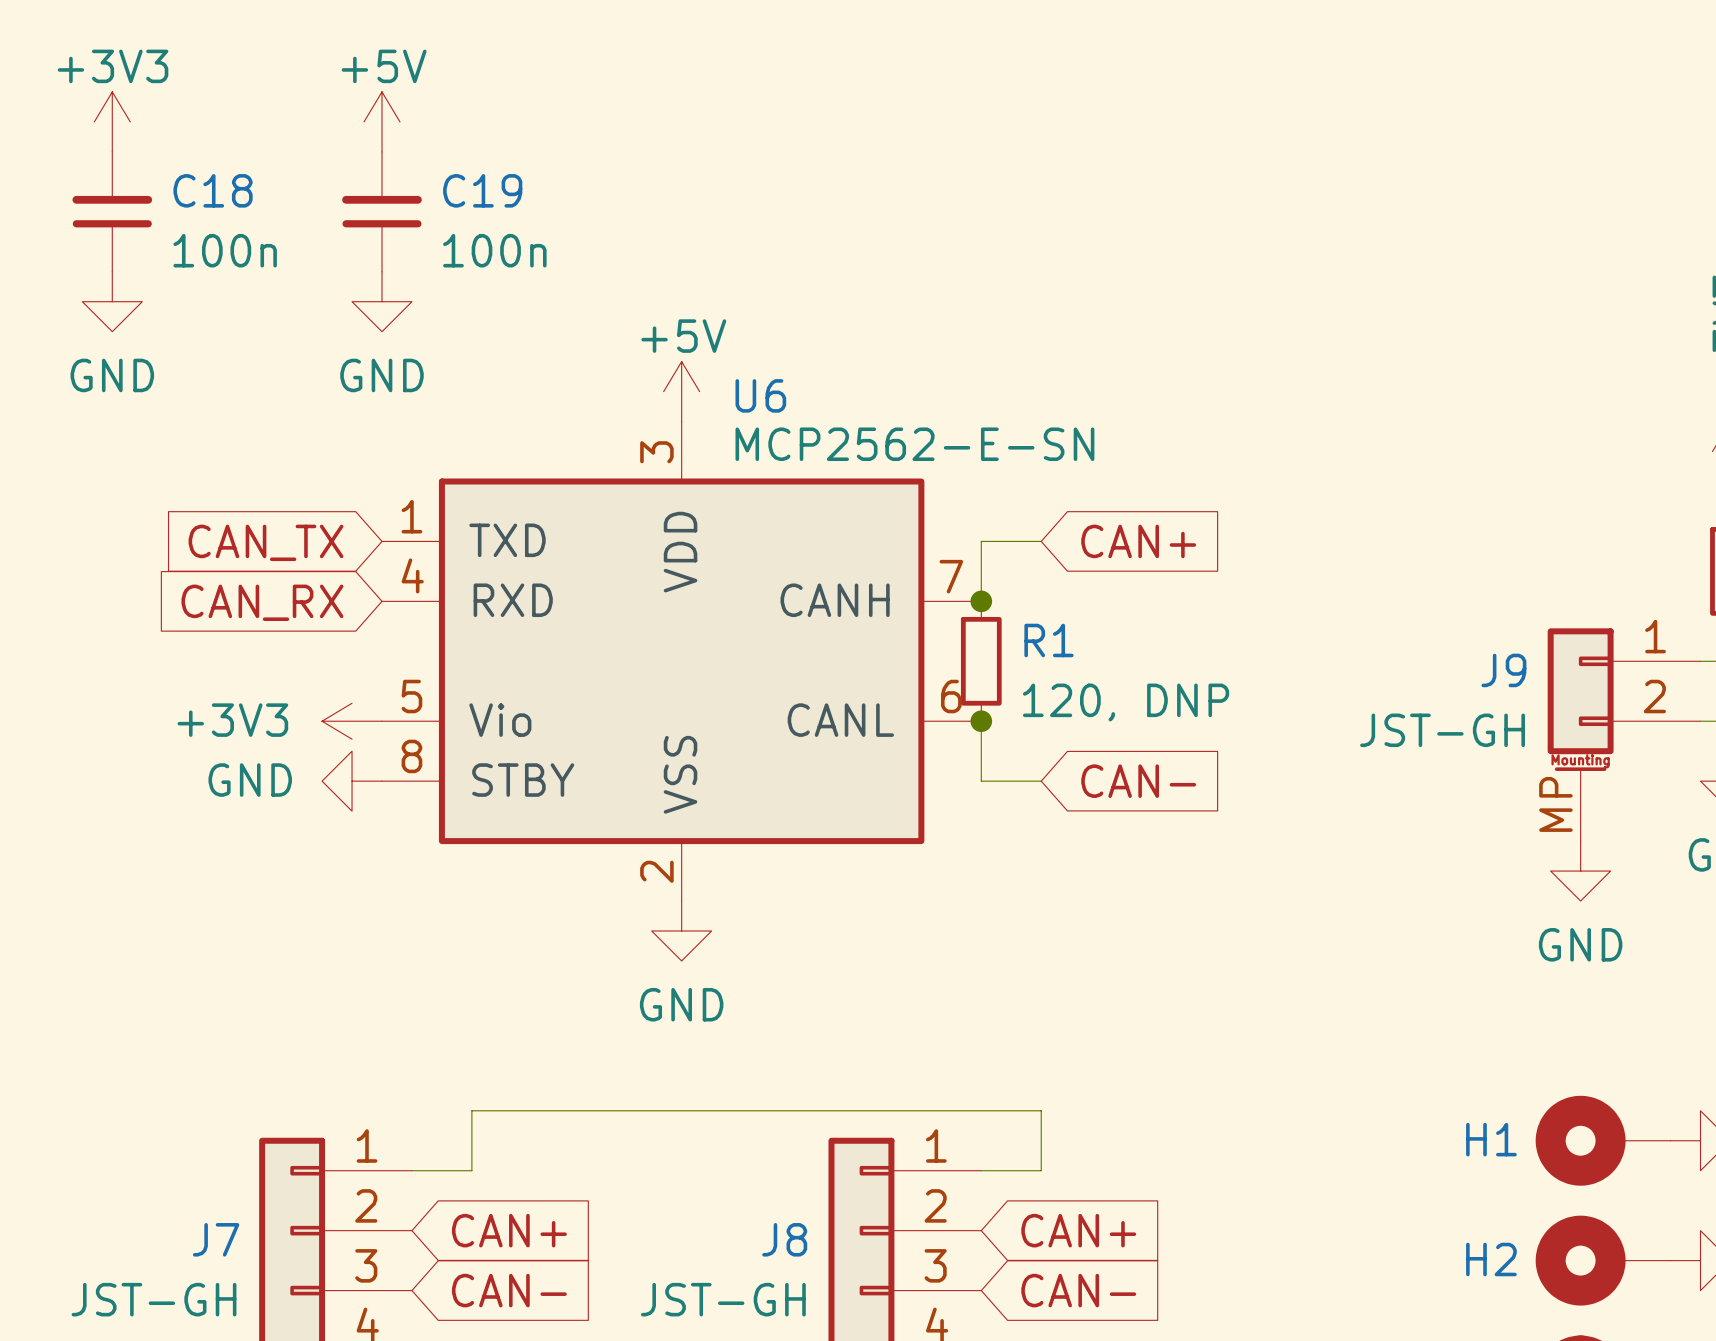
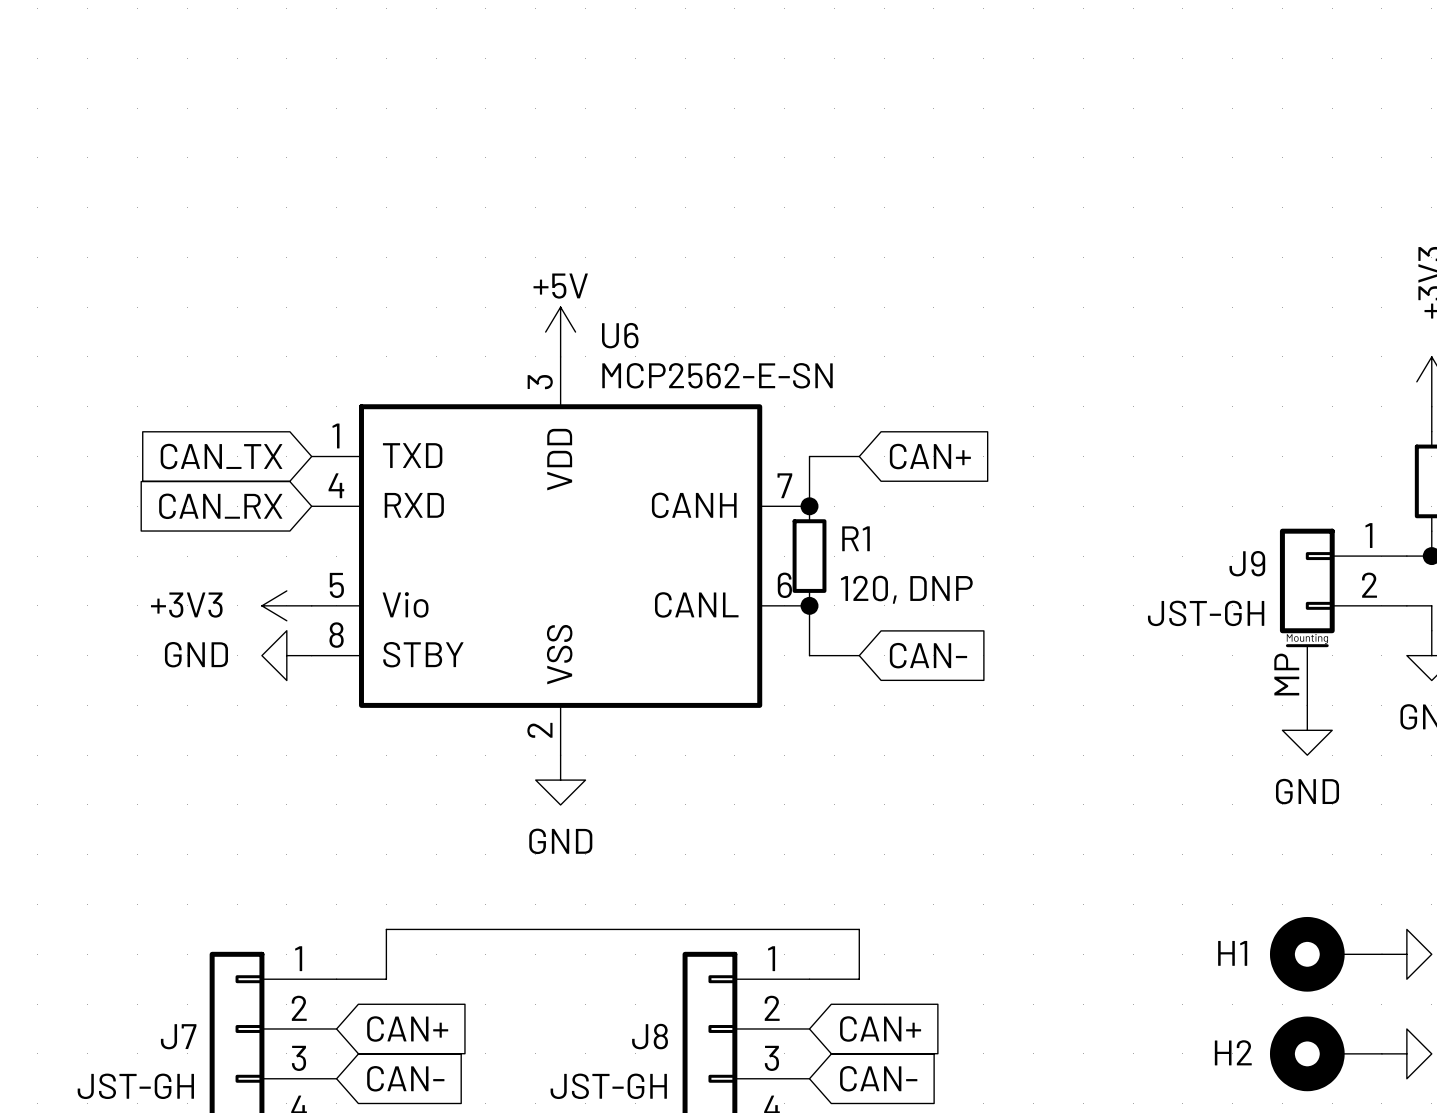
power symbol: +3V3 (112, 121) -> none
power symbol: +5V (381, 121) -> none
C18: 100n (112, 211) -> none
C19: 100n (381, 211) -> none
power symbol: GND (112, 301) -> none
power symbol: GND (381, 301) -> none

